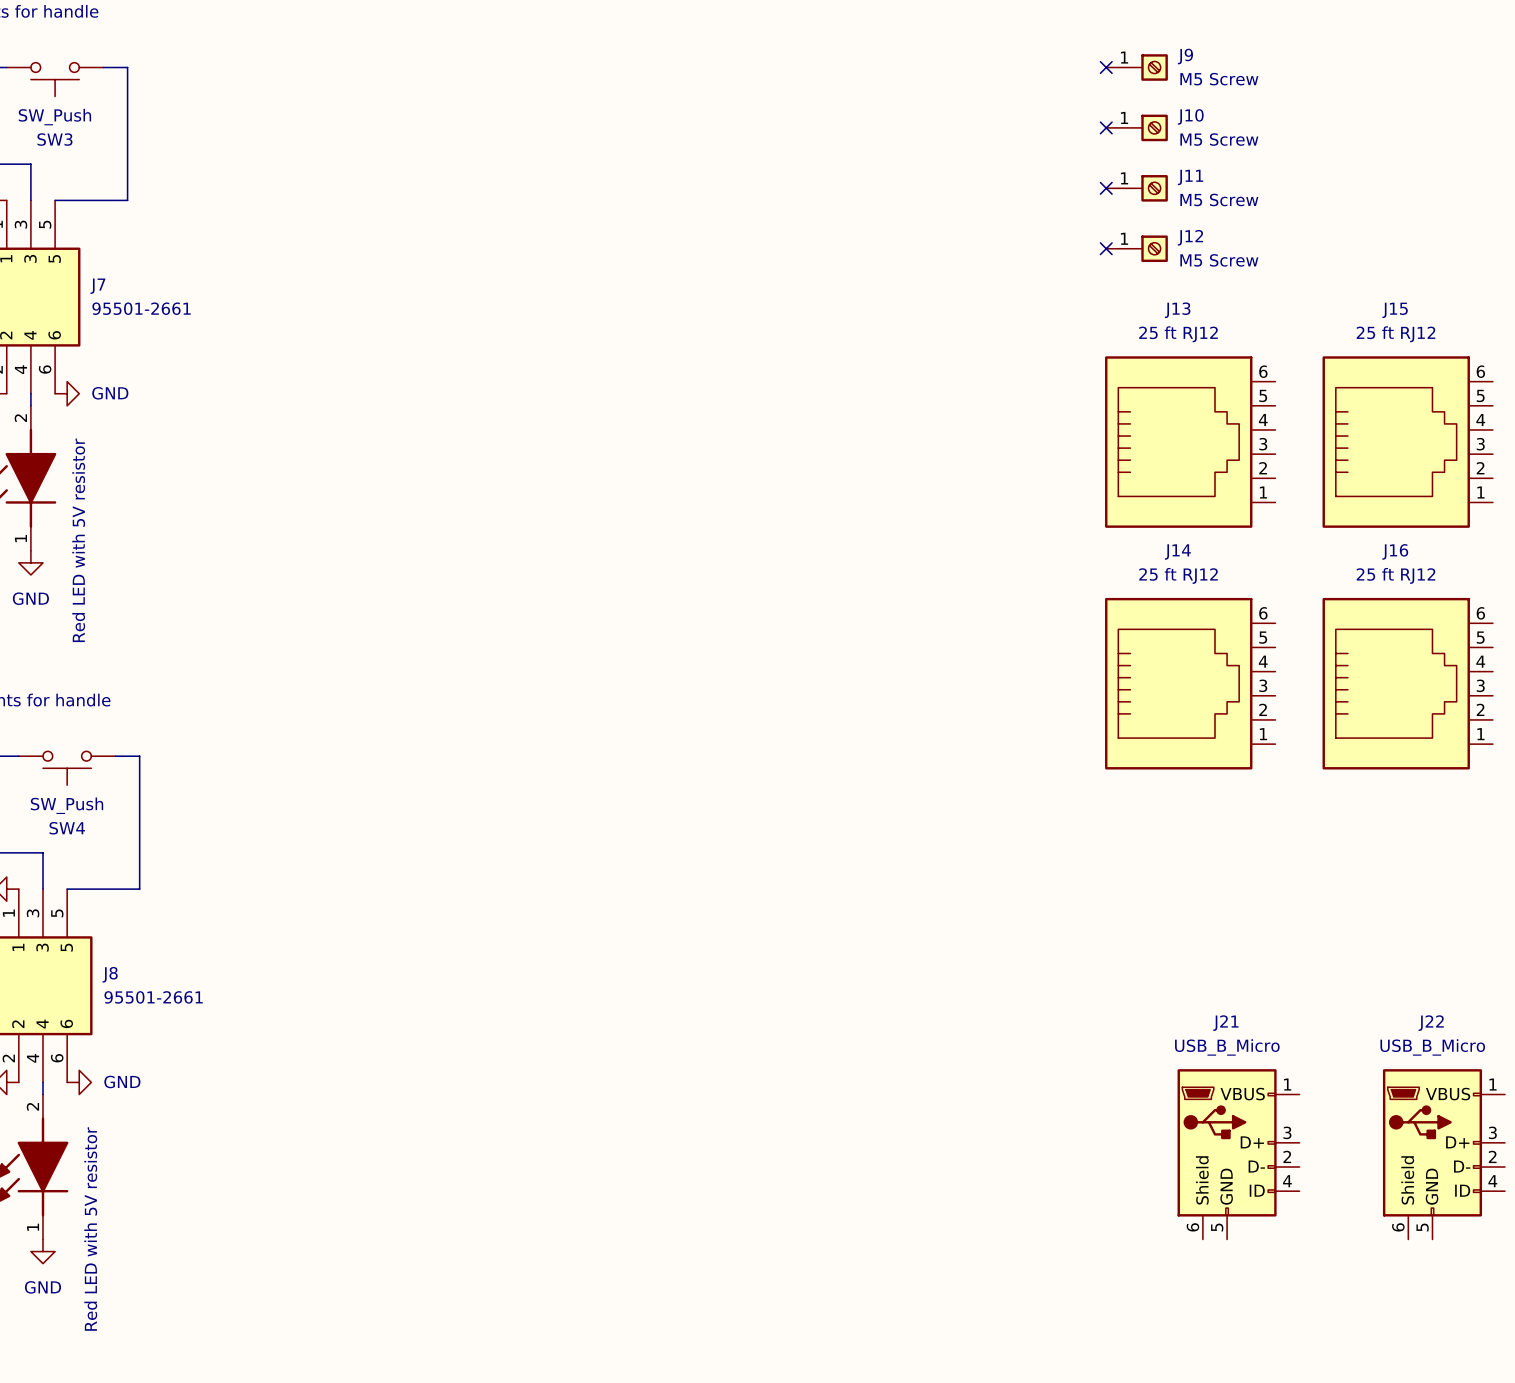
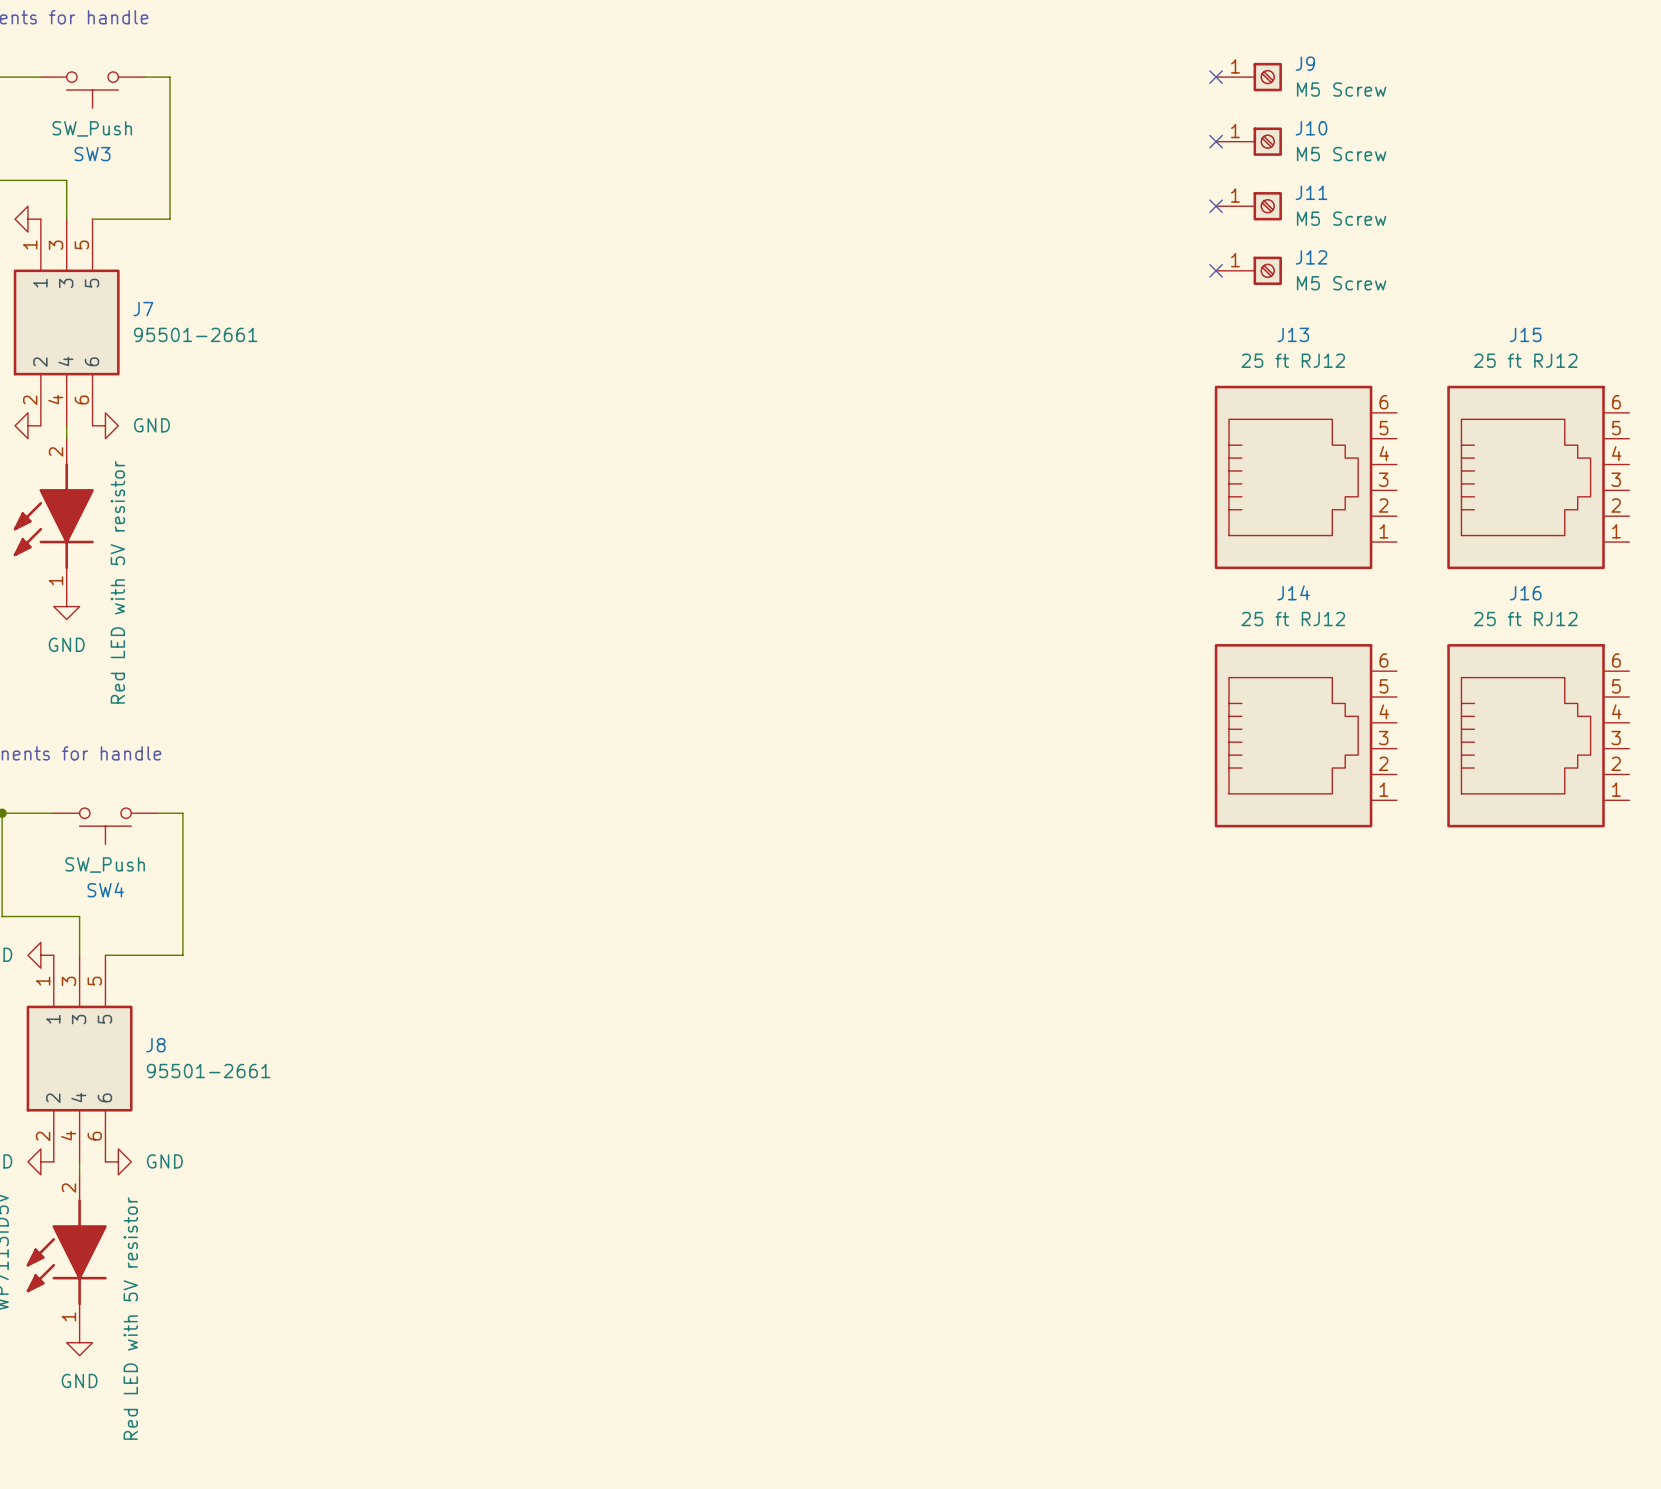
J21: USB_B_Micro (1238, 1154) -> none
J22: USB_B_Micro (1443, 1154) -> none

